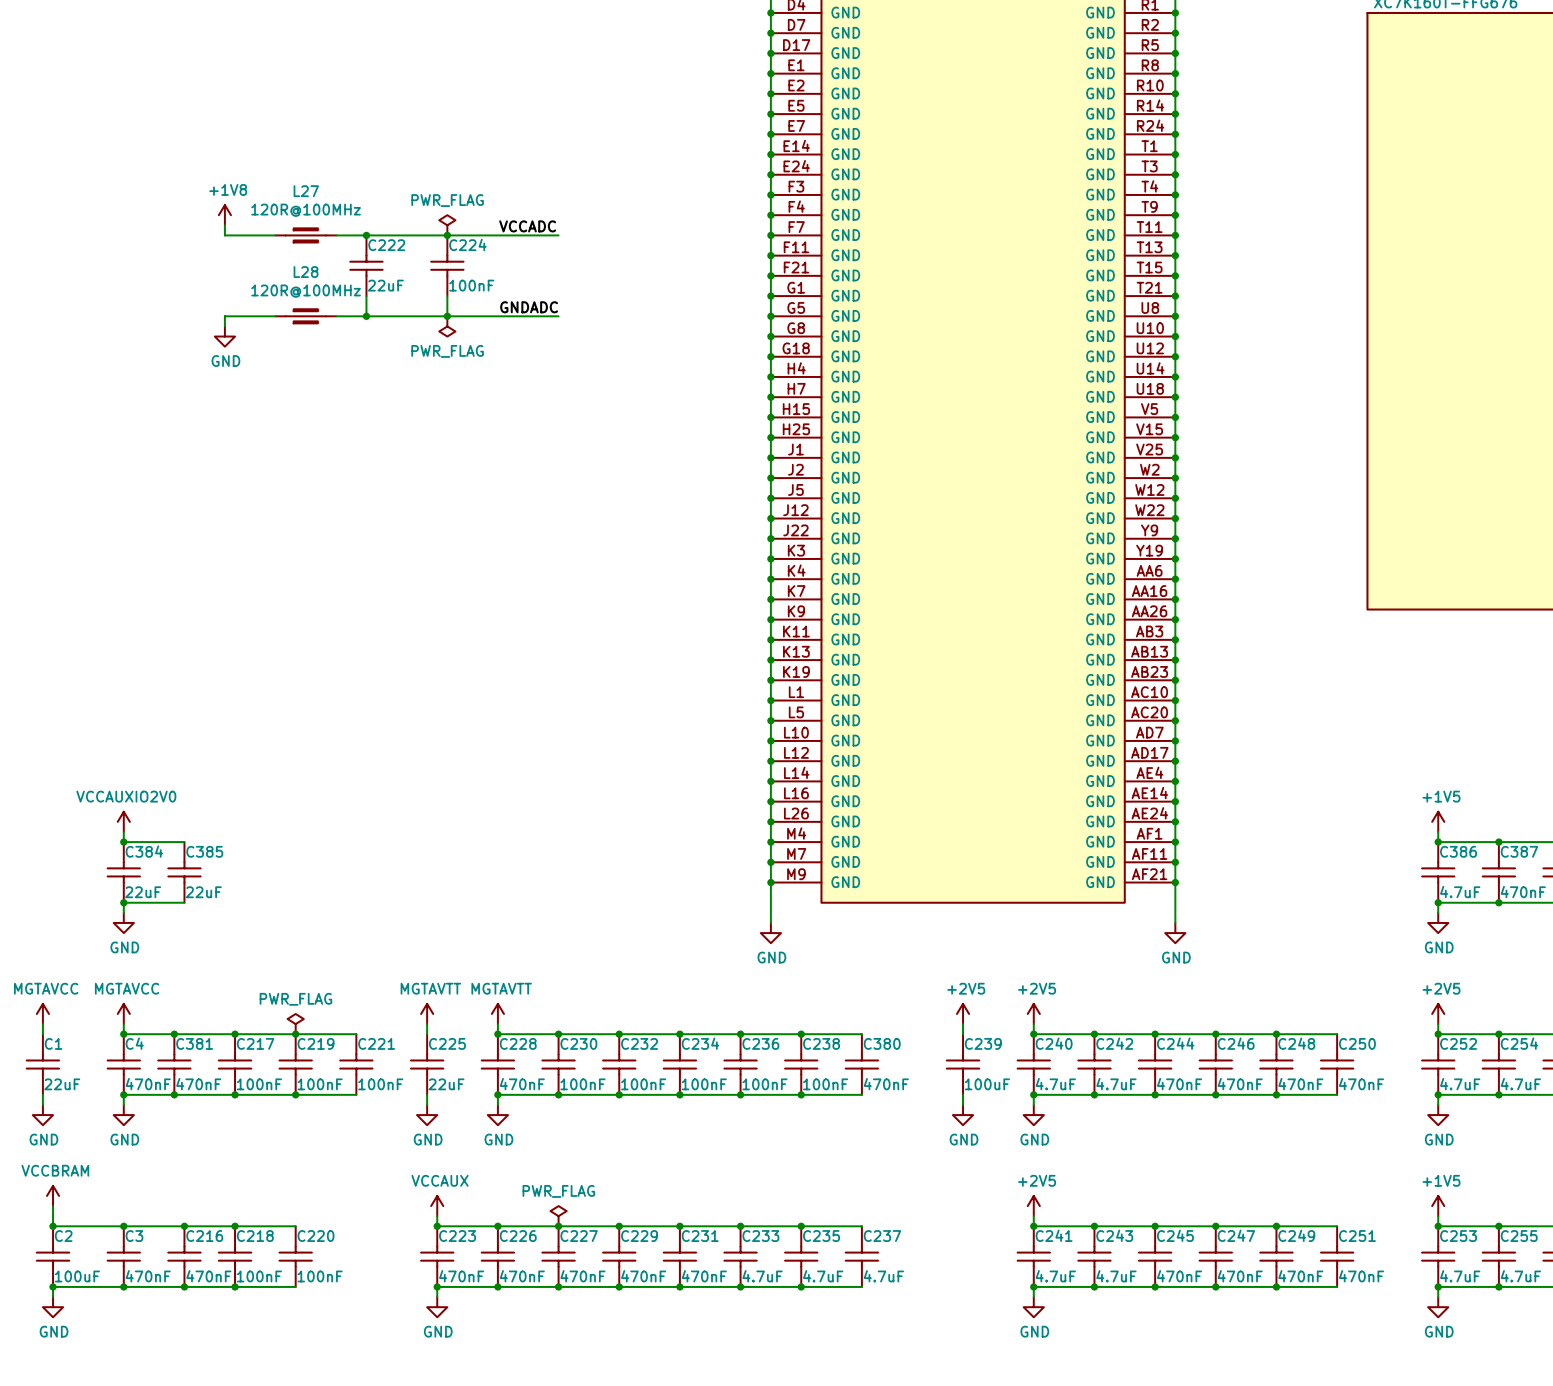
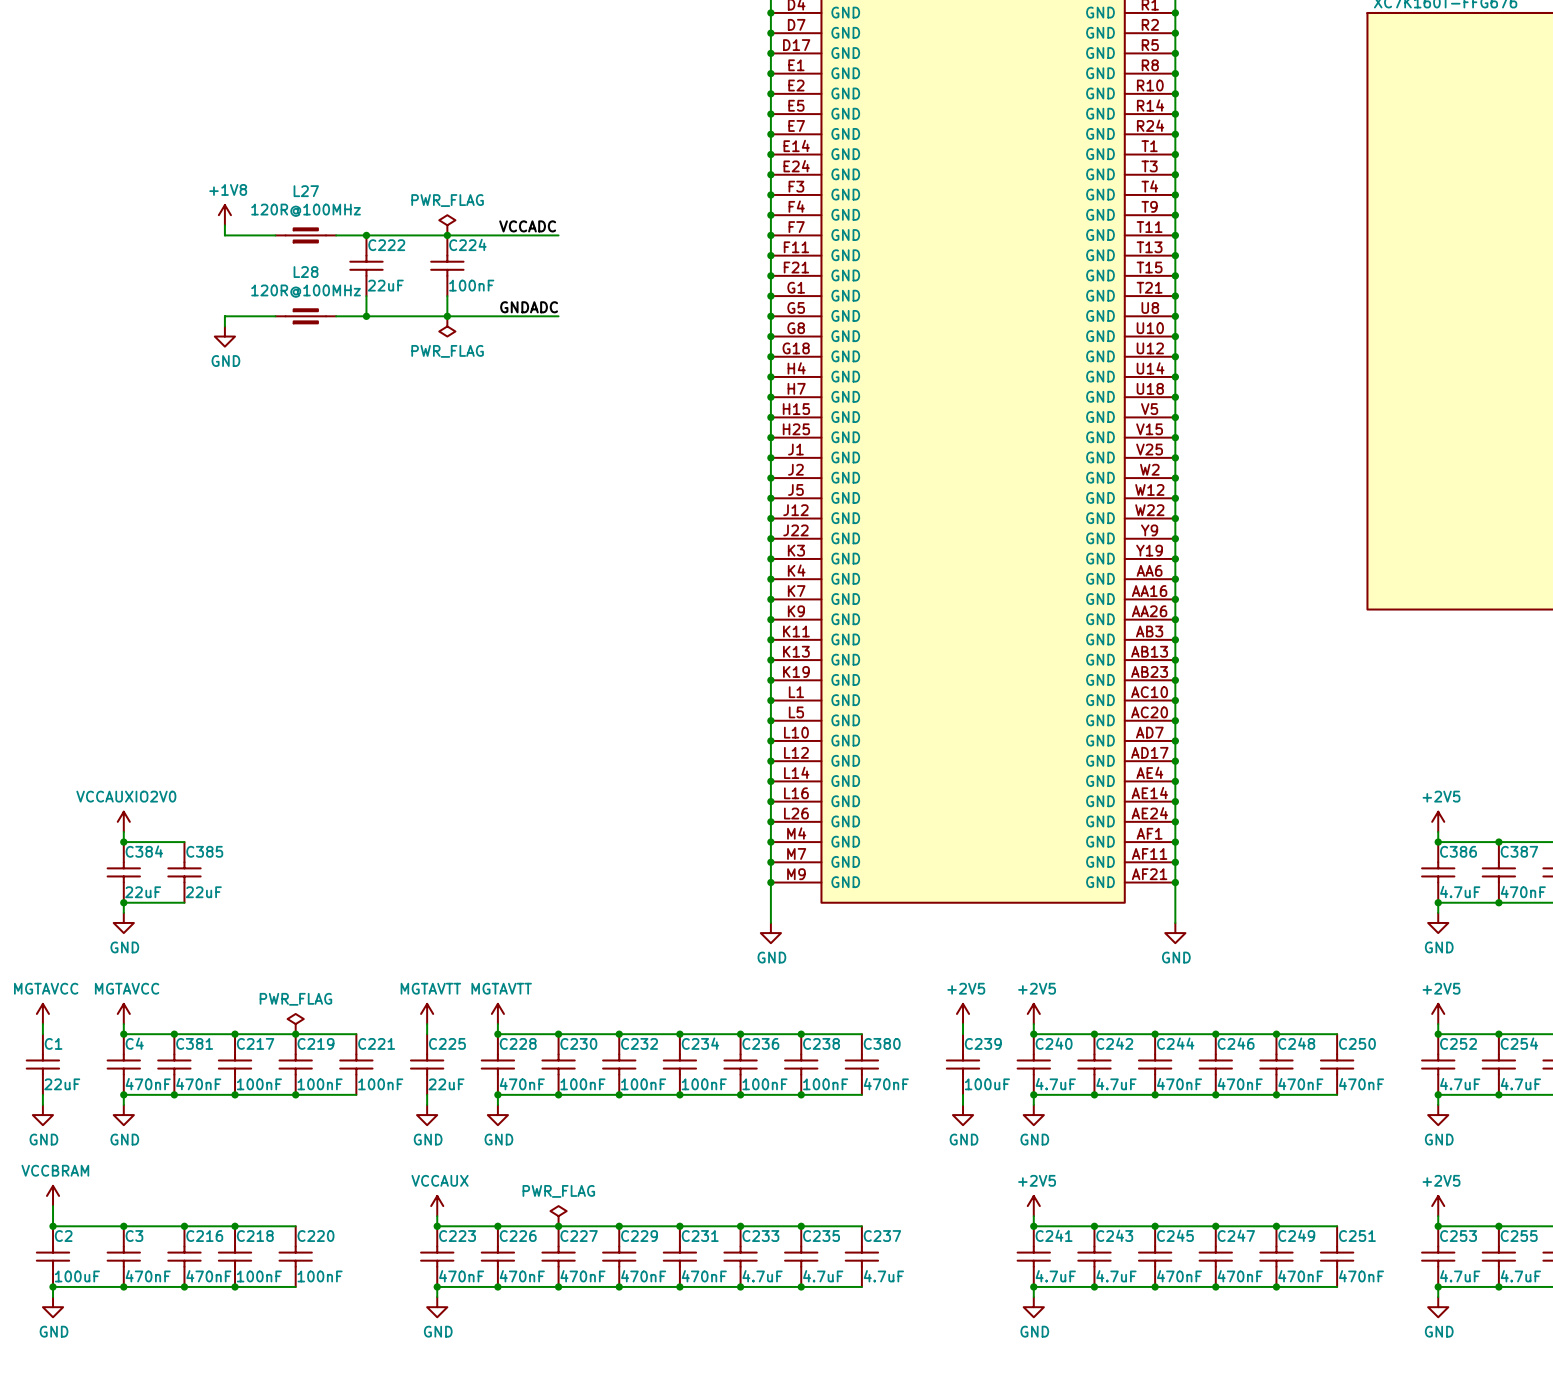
power symbol: +1V5 (1438, 821) -> +2V5 (1438, 821)
power symbol: +1V5 (1438, 1206) -> +2V5 (1438, 1206)

